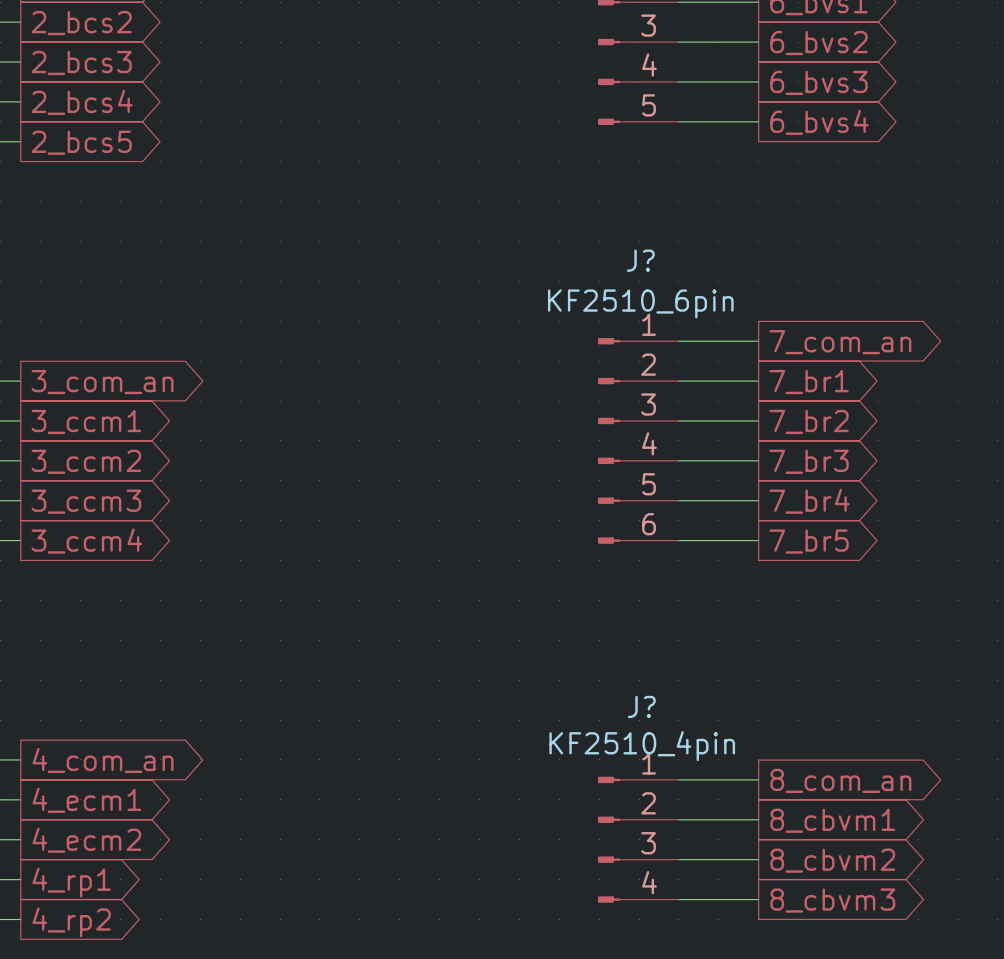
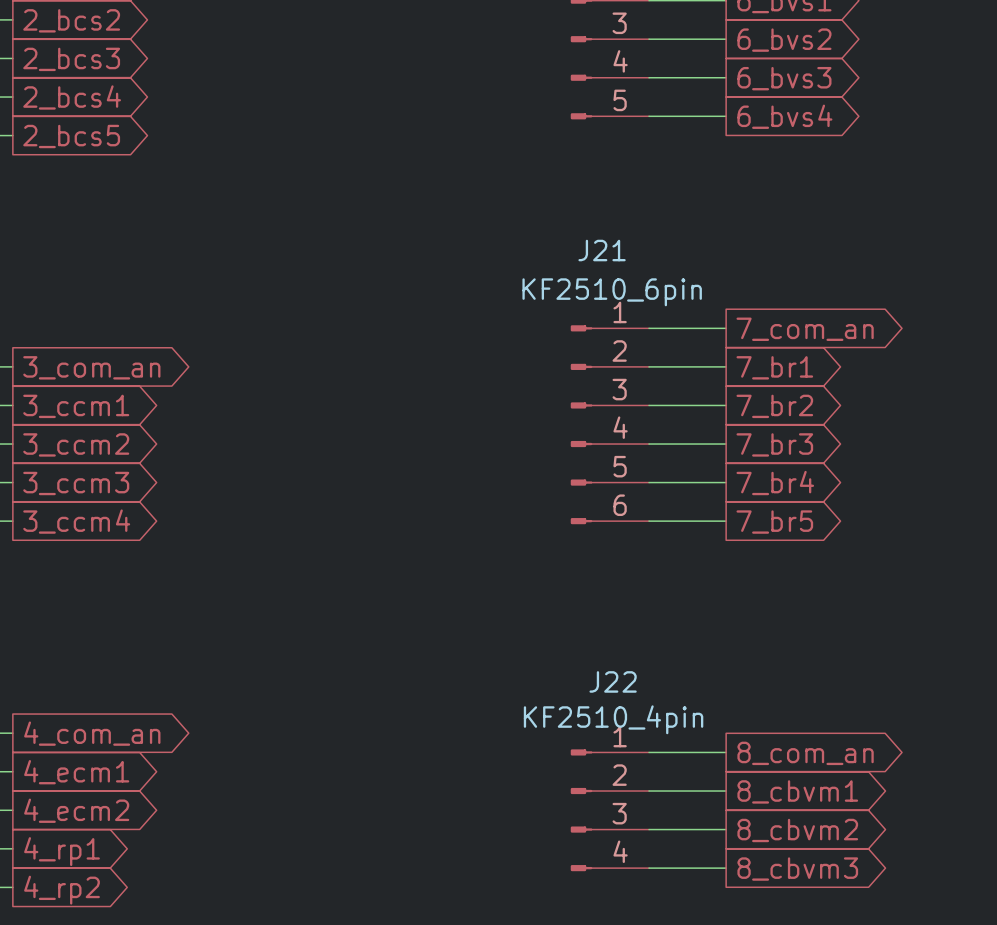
J? name: J? (640, 260) -> J21 (602, 250)
J? name: J? (641, 706) -> J22 (613, 681)

